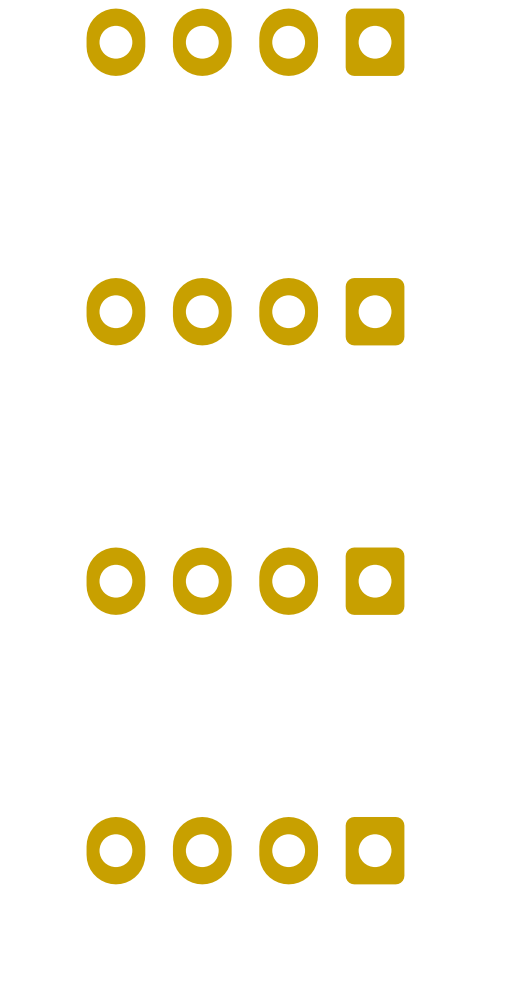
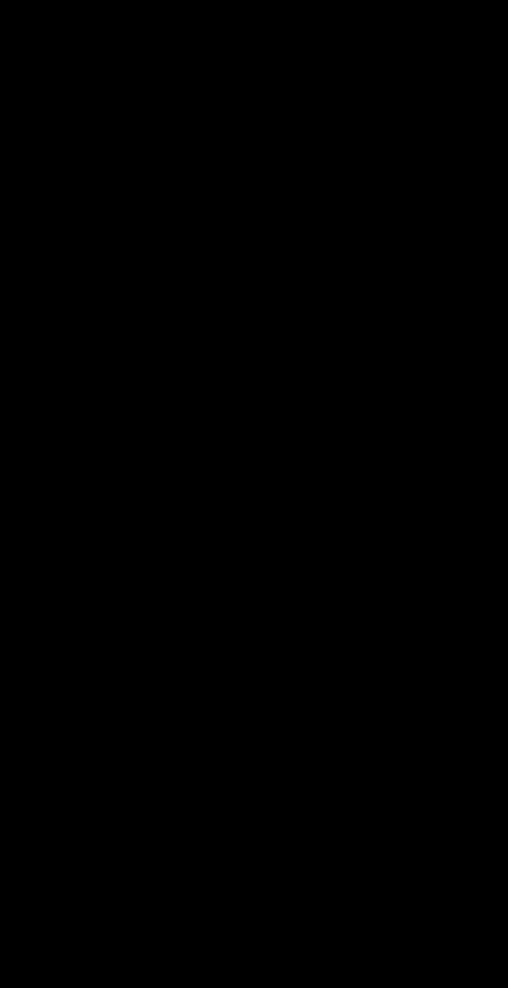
part: (245, 42) -> none
part: (245, 311) -> none
part: (245, 581) -> none
part: (245, 850) -> none

